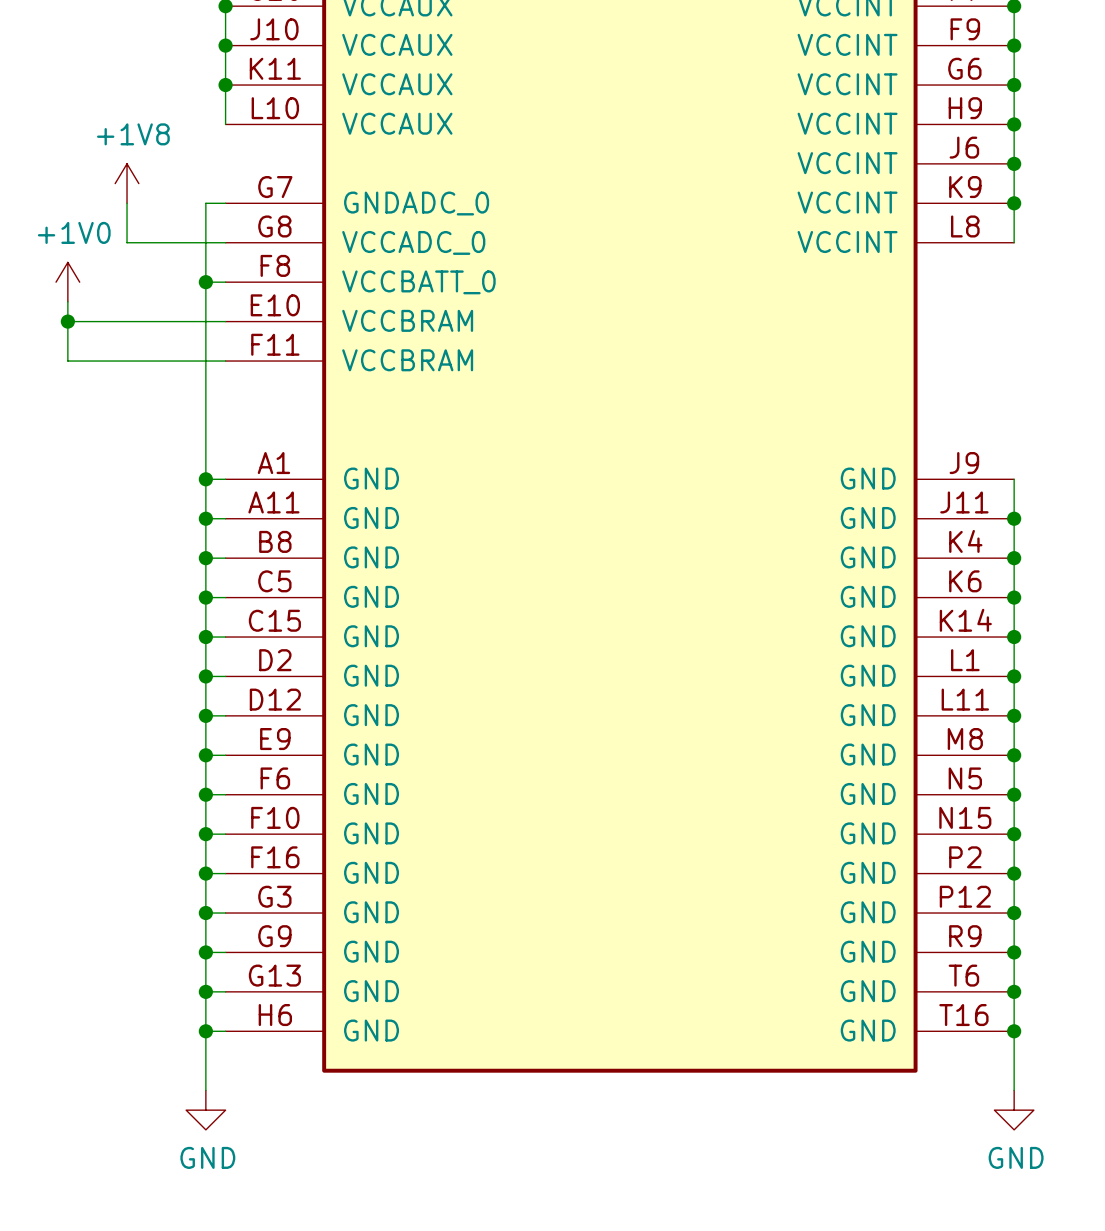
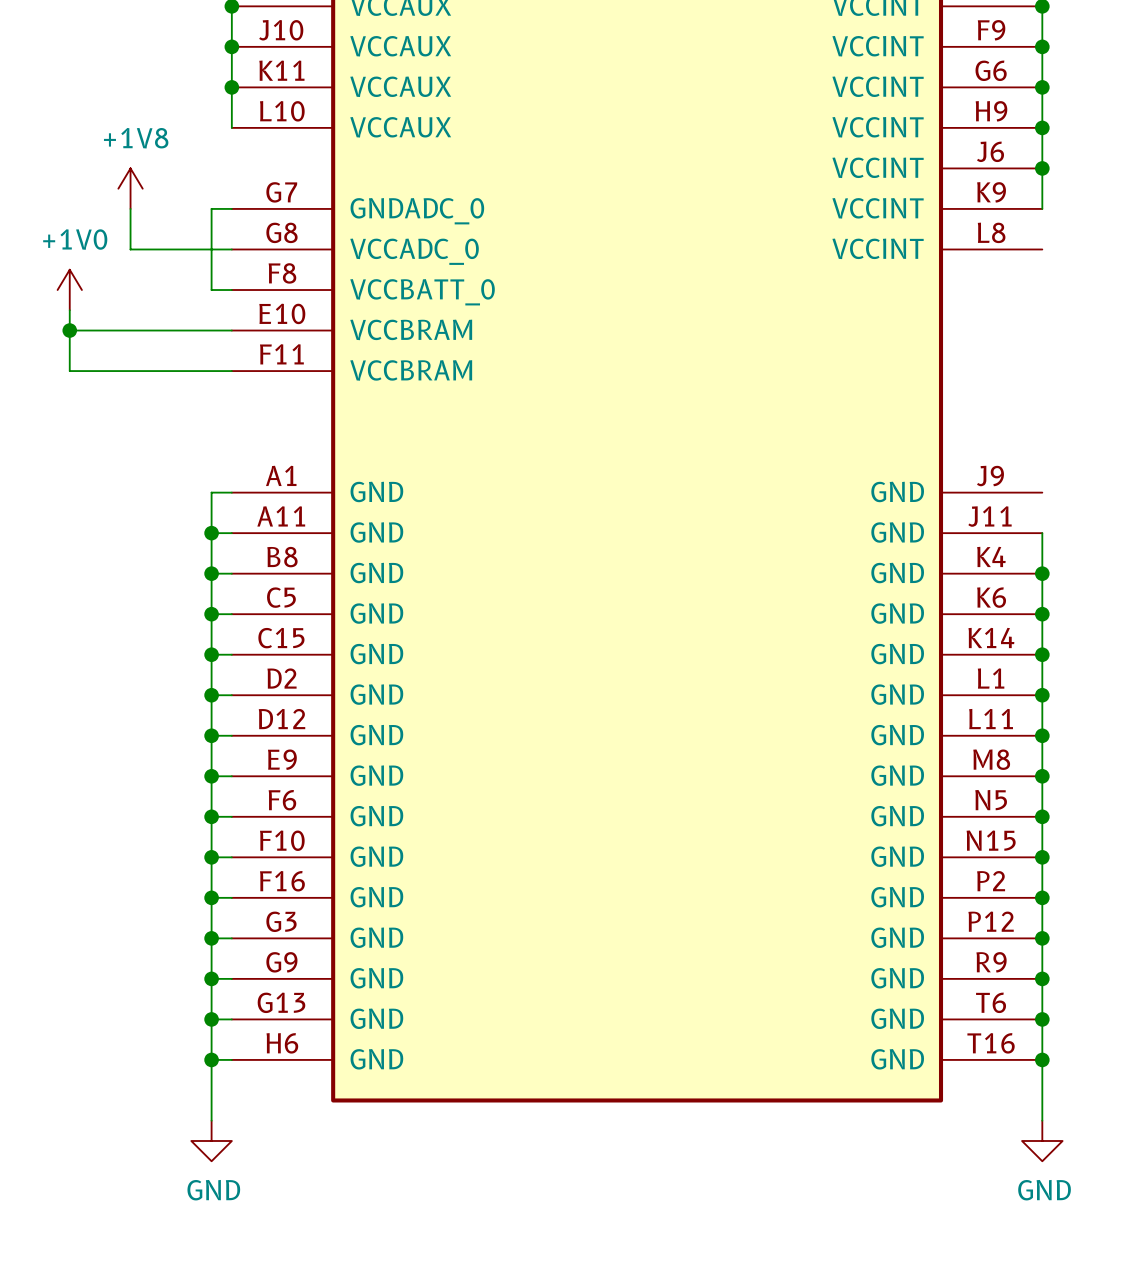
wire: (1014, 203) (1014, 242) -> none
junction: (1014, 203) -> none
wire: (205, 282) (205, 479) -> none
junction: (205, 282) -> none
junction: (205, 479) -> none
wire: (1014, 479) (1014, 518) -> none
junction: (1014, 518) -> none

